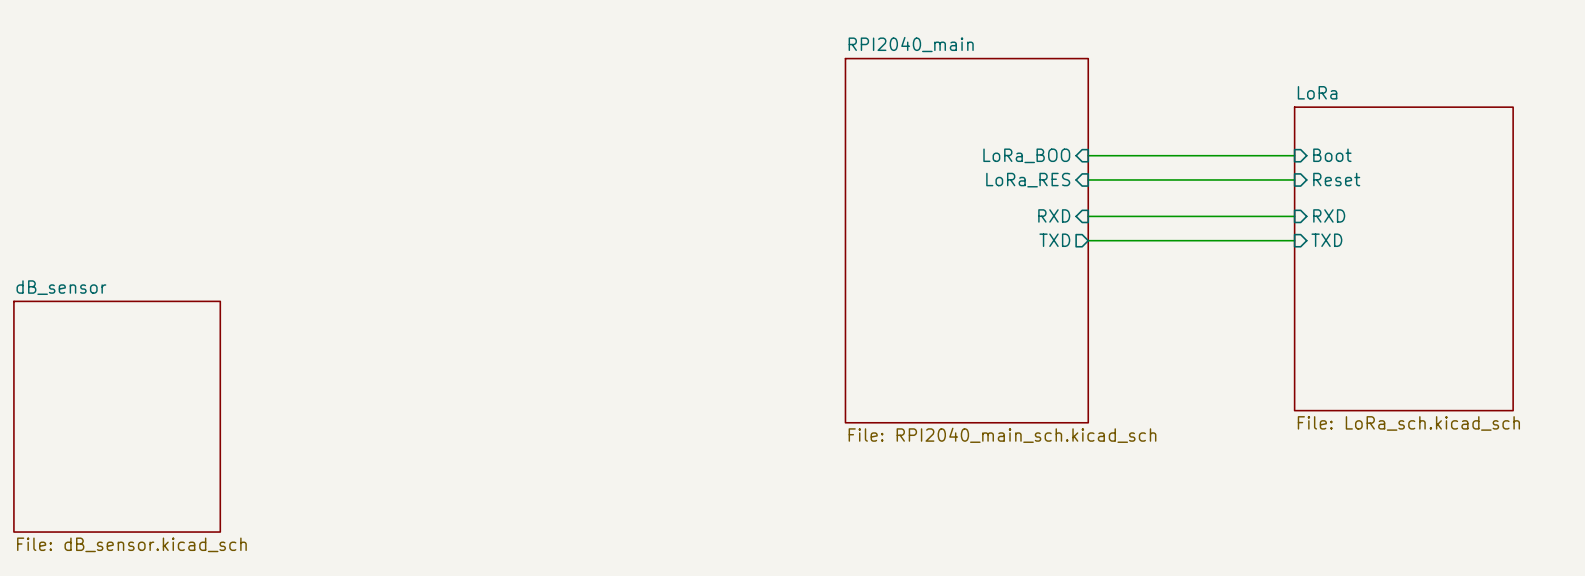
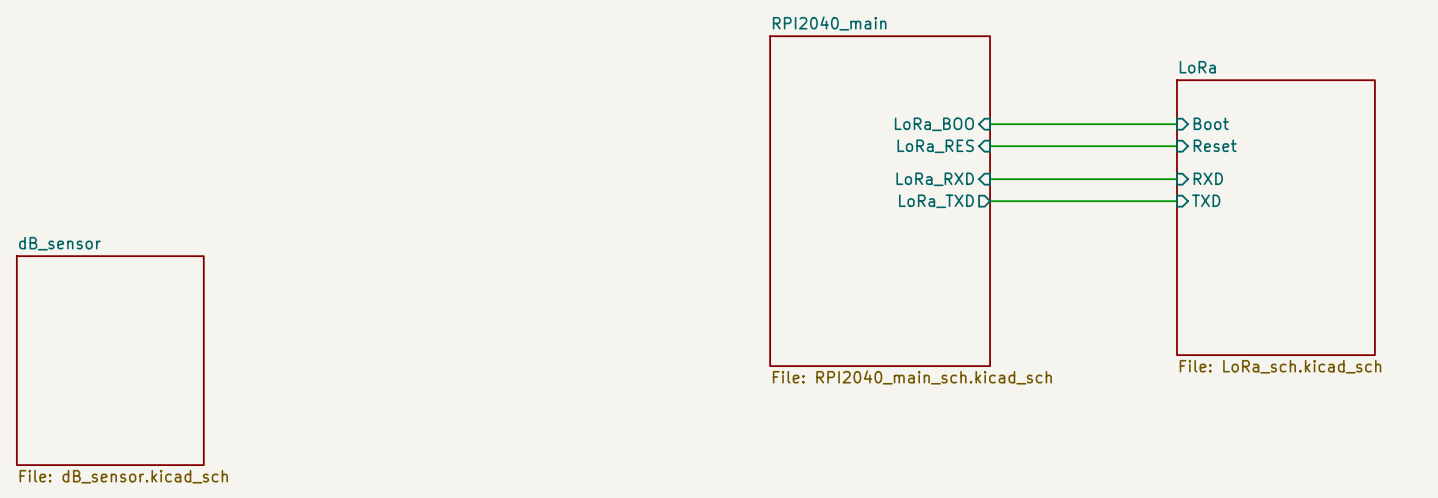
sheet pin: RXD (1054, 215) -> LoRa_RXD (935, 179)
sheet pin: TXD (1054, 240) -> LoRa_TXD (936, 201)

